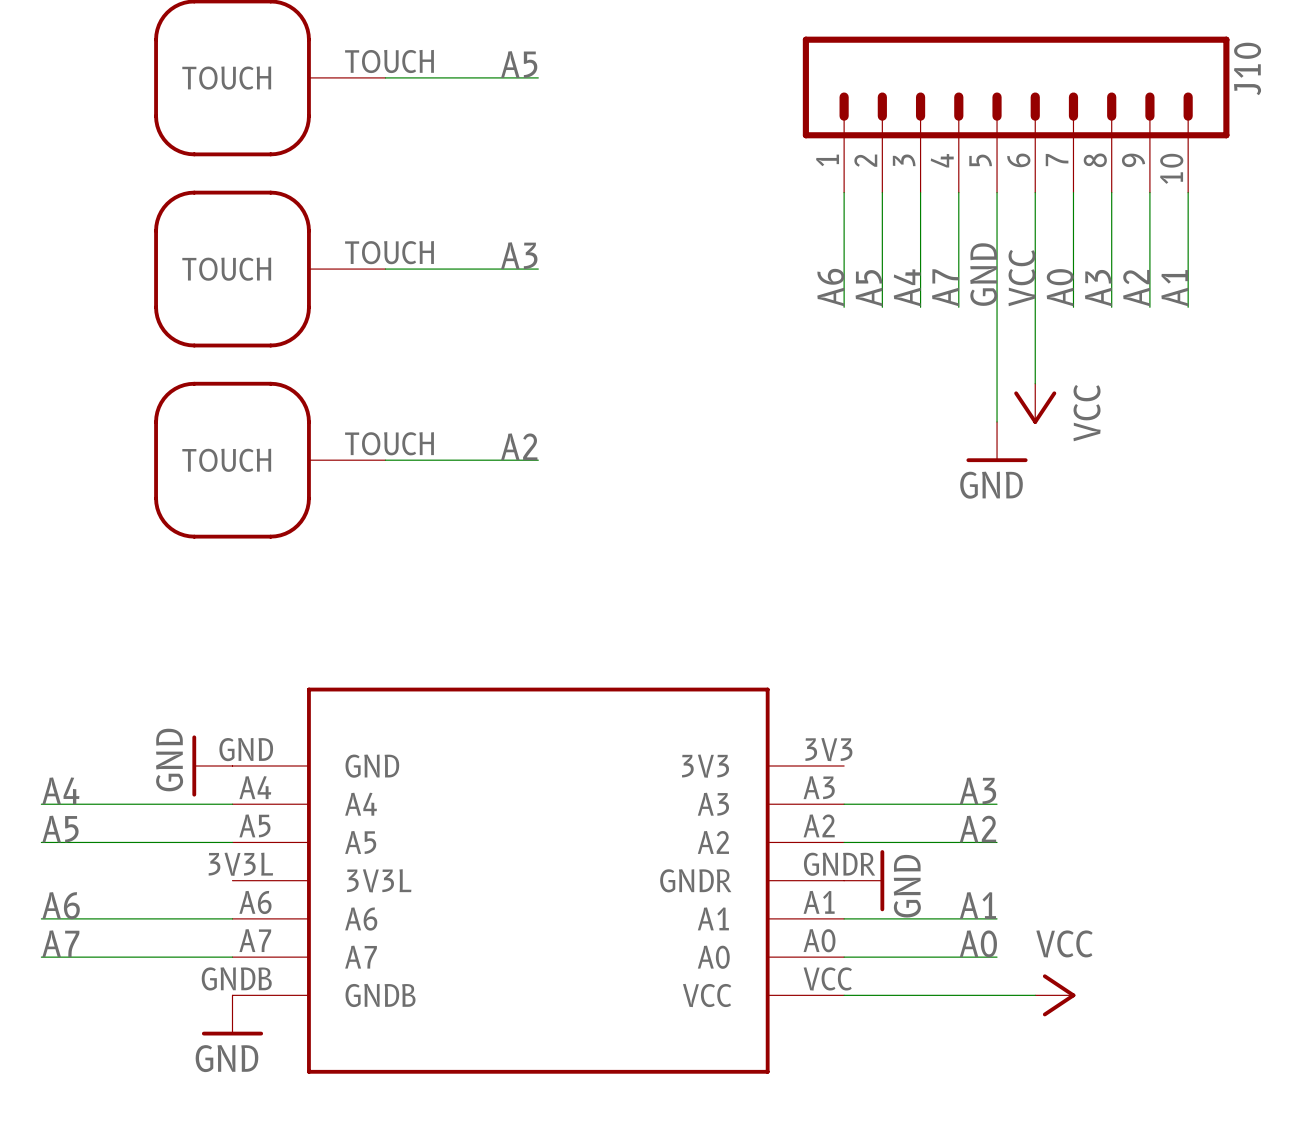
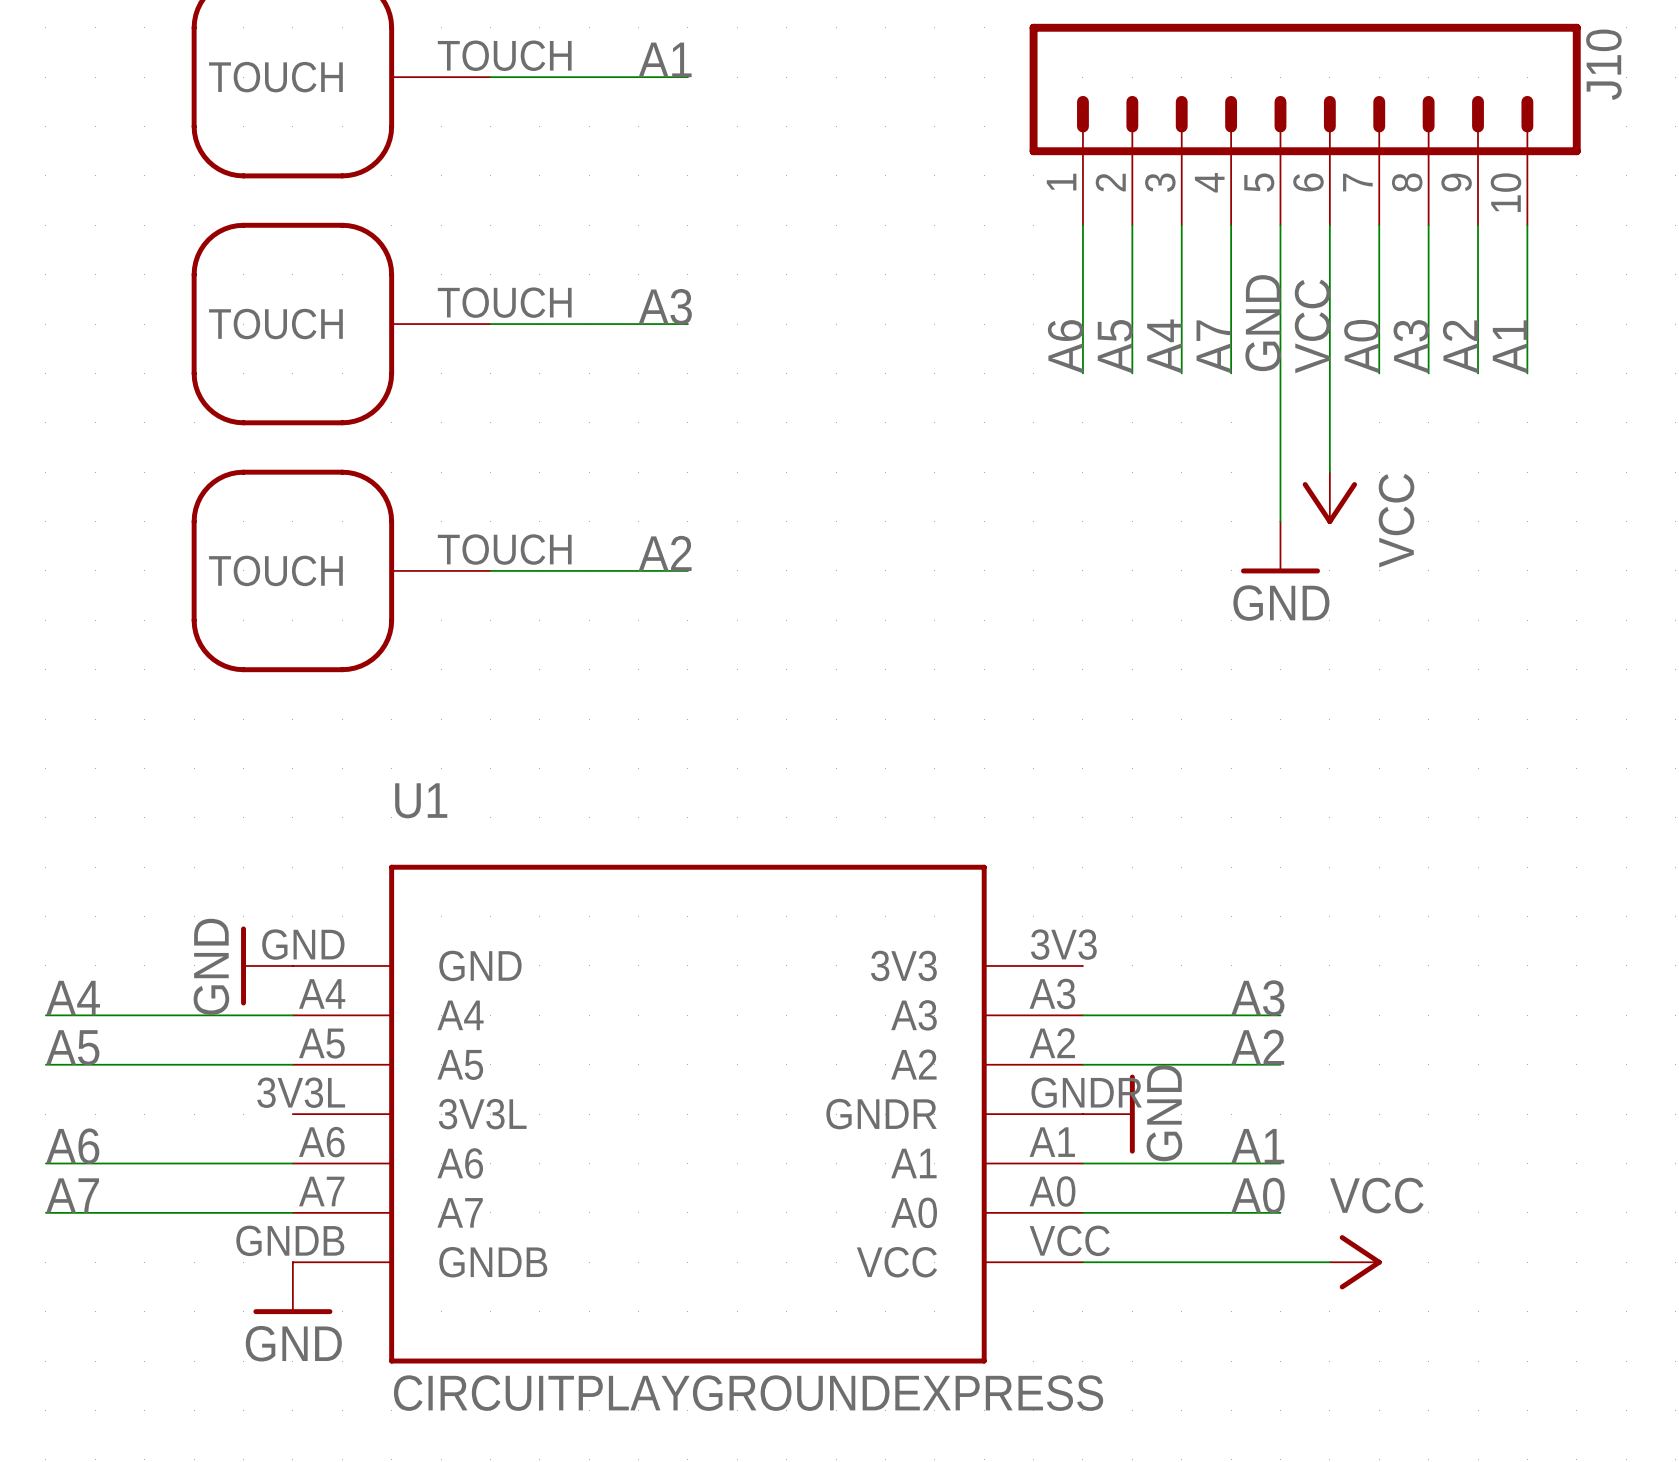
label: A5 (519, 64) -> A1 (665, 59)
U1 name: none -> U1 (421, 800)
U1 value: none -> CIRCUITPLAYGROUNDEXPRESS (748, 1393)

